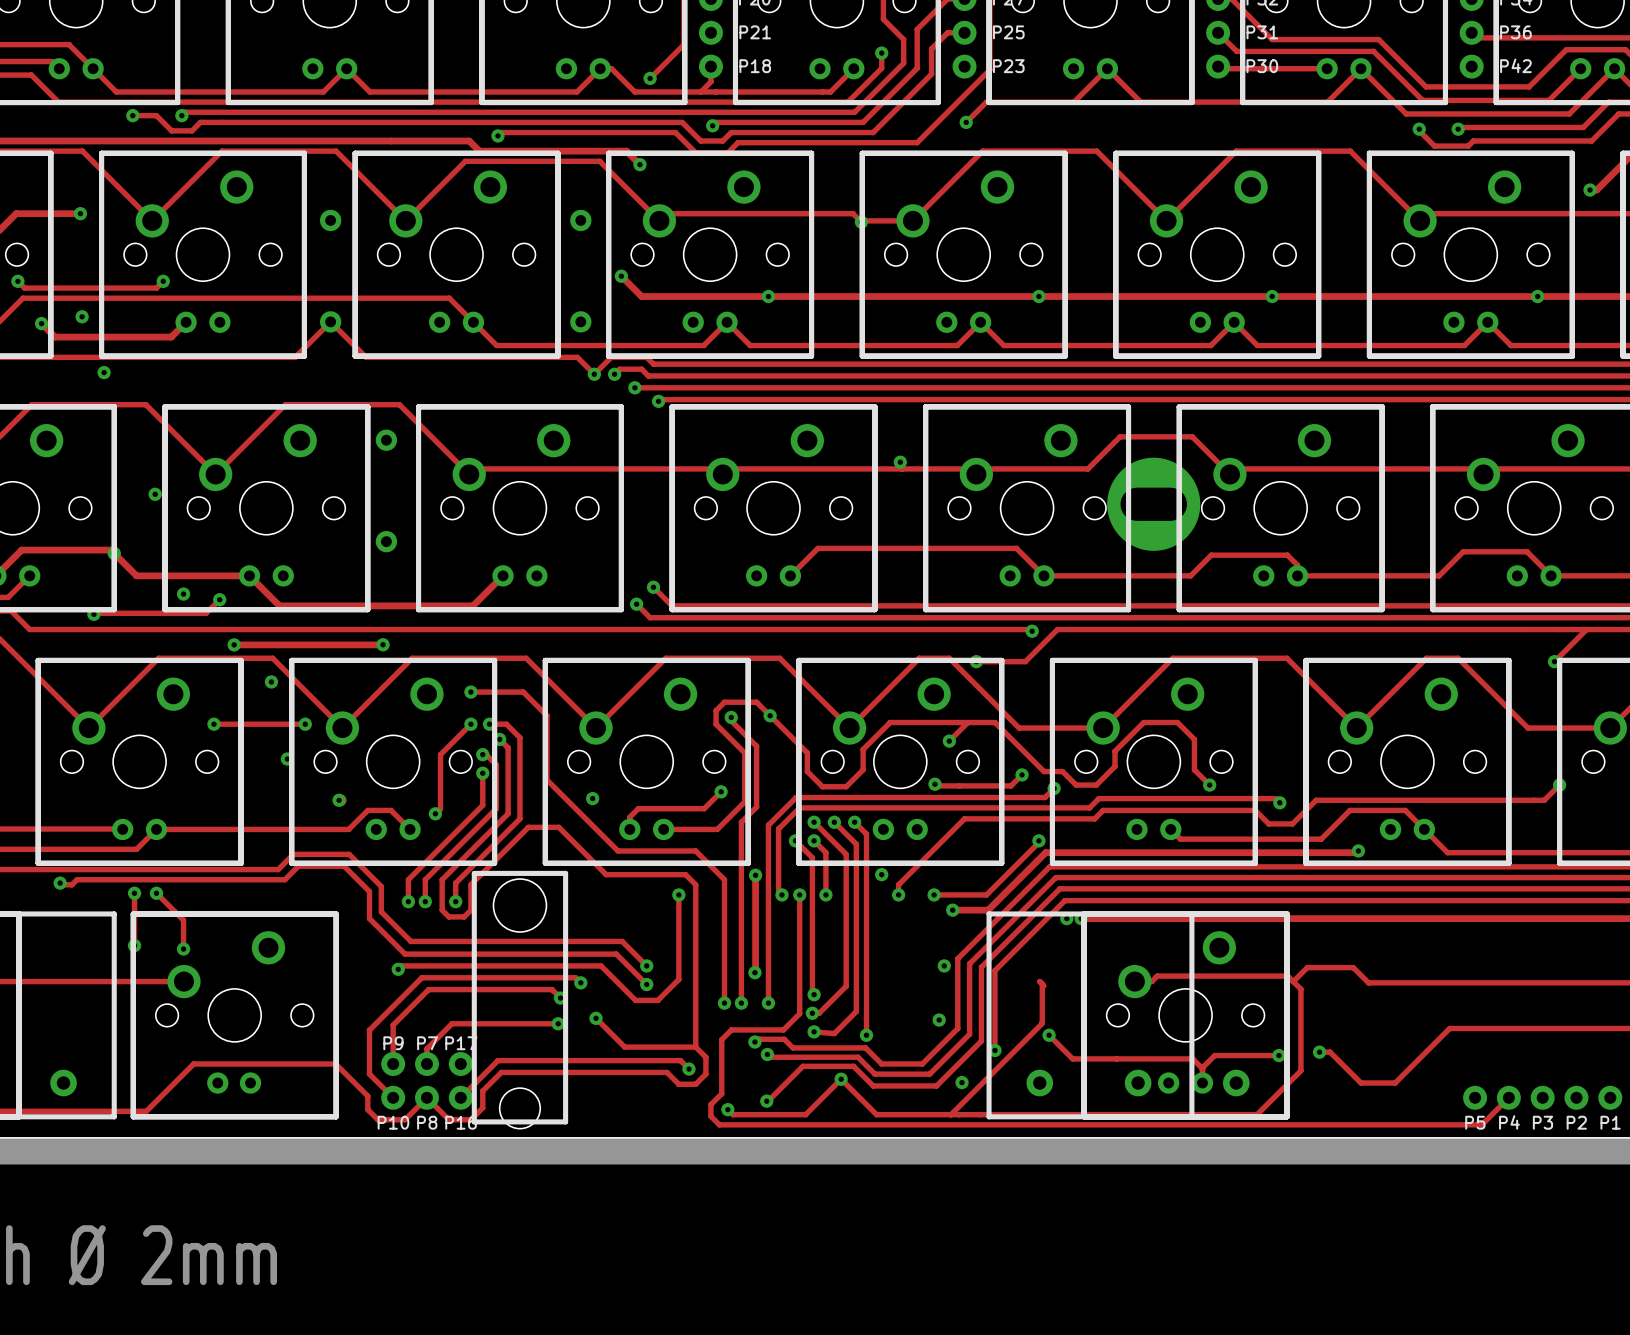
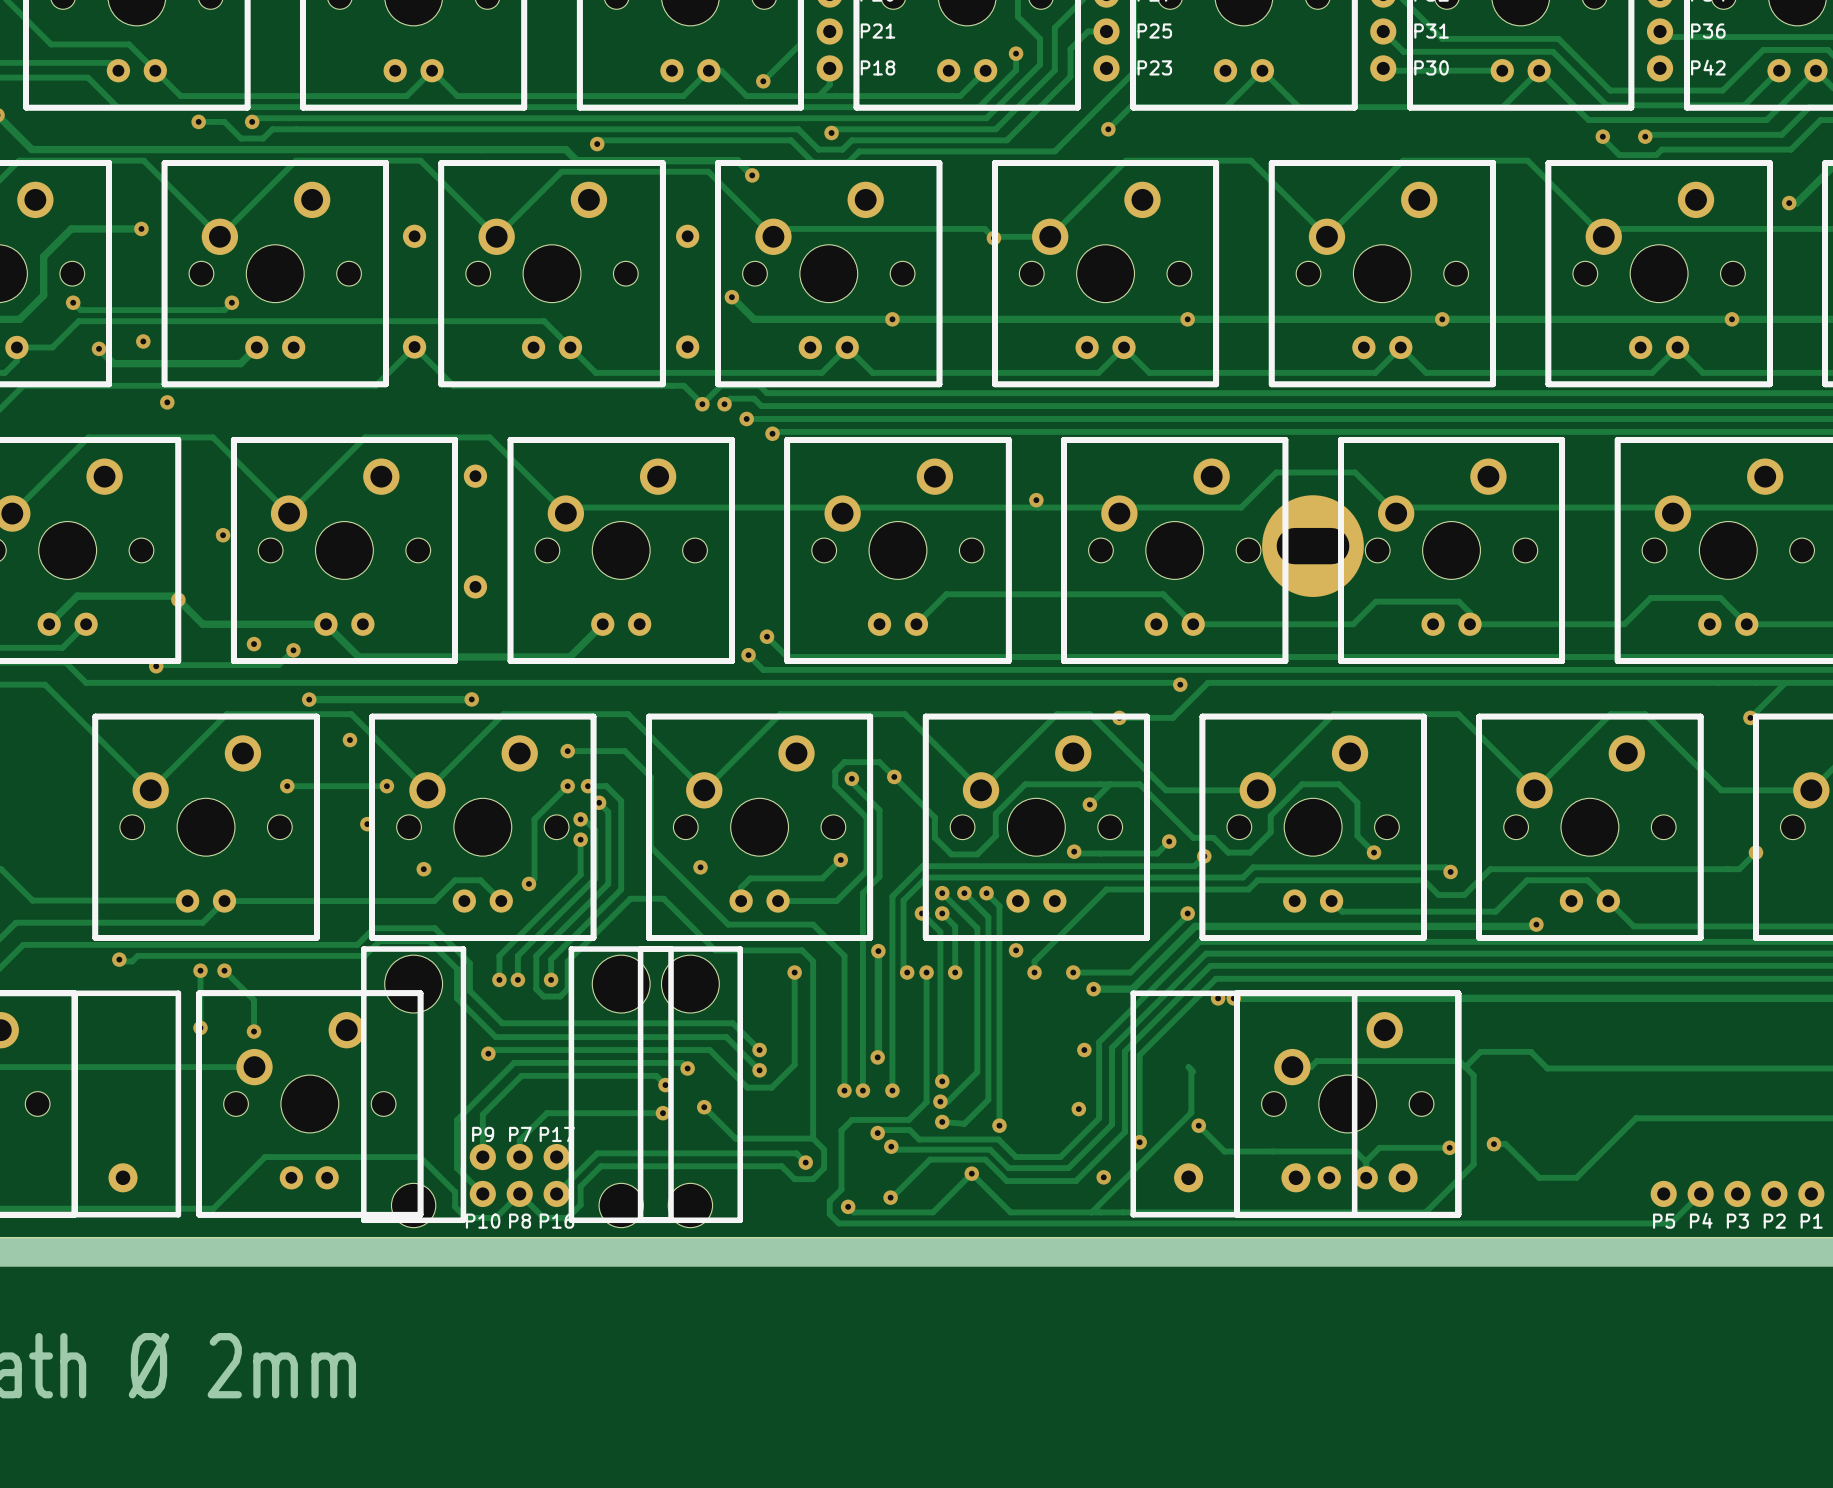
part: none -> (413, 1086)
part: none -> (690, 1086)

